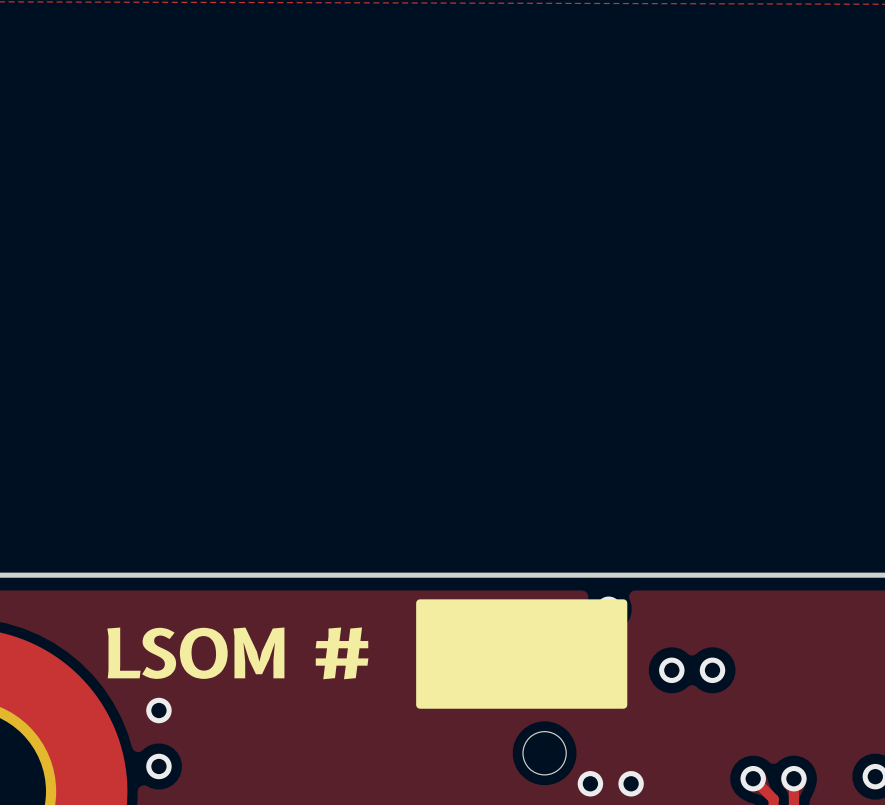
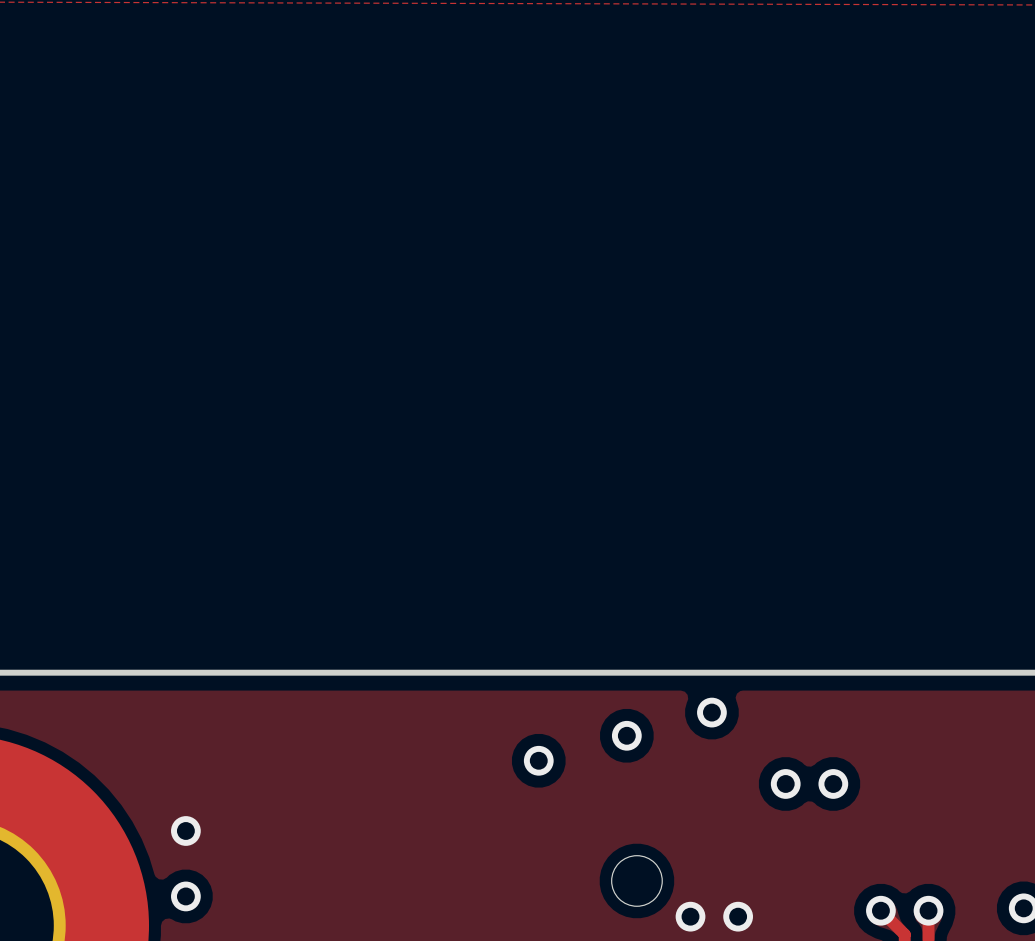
drawing: [416, 599, 628, 709] -> none
text: LSOM # (237, 653) -> none

